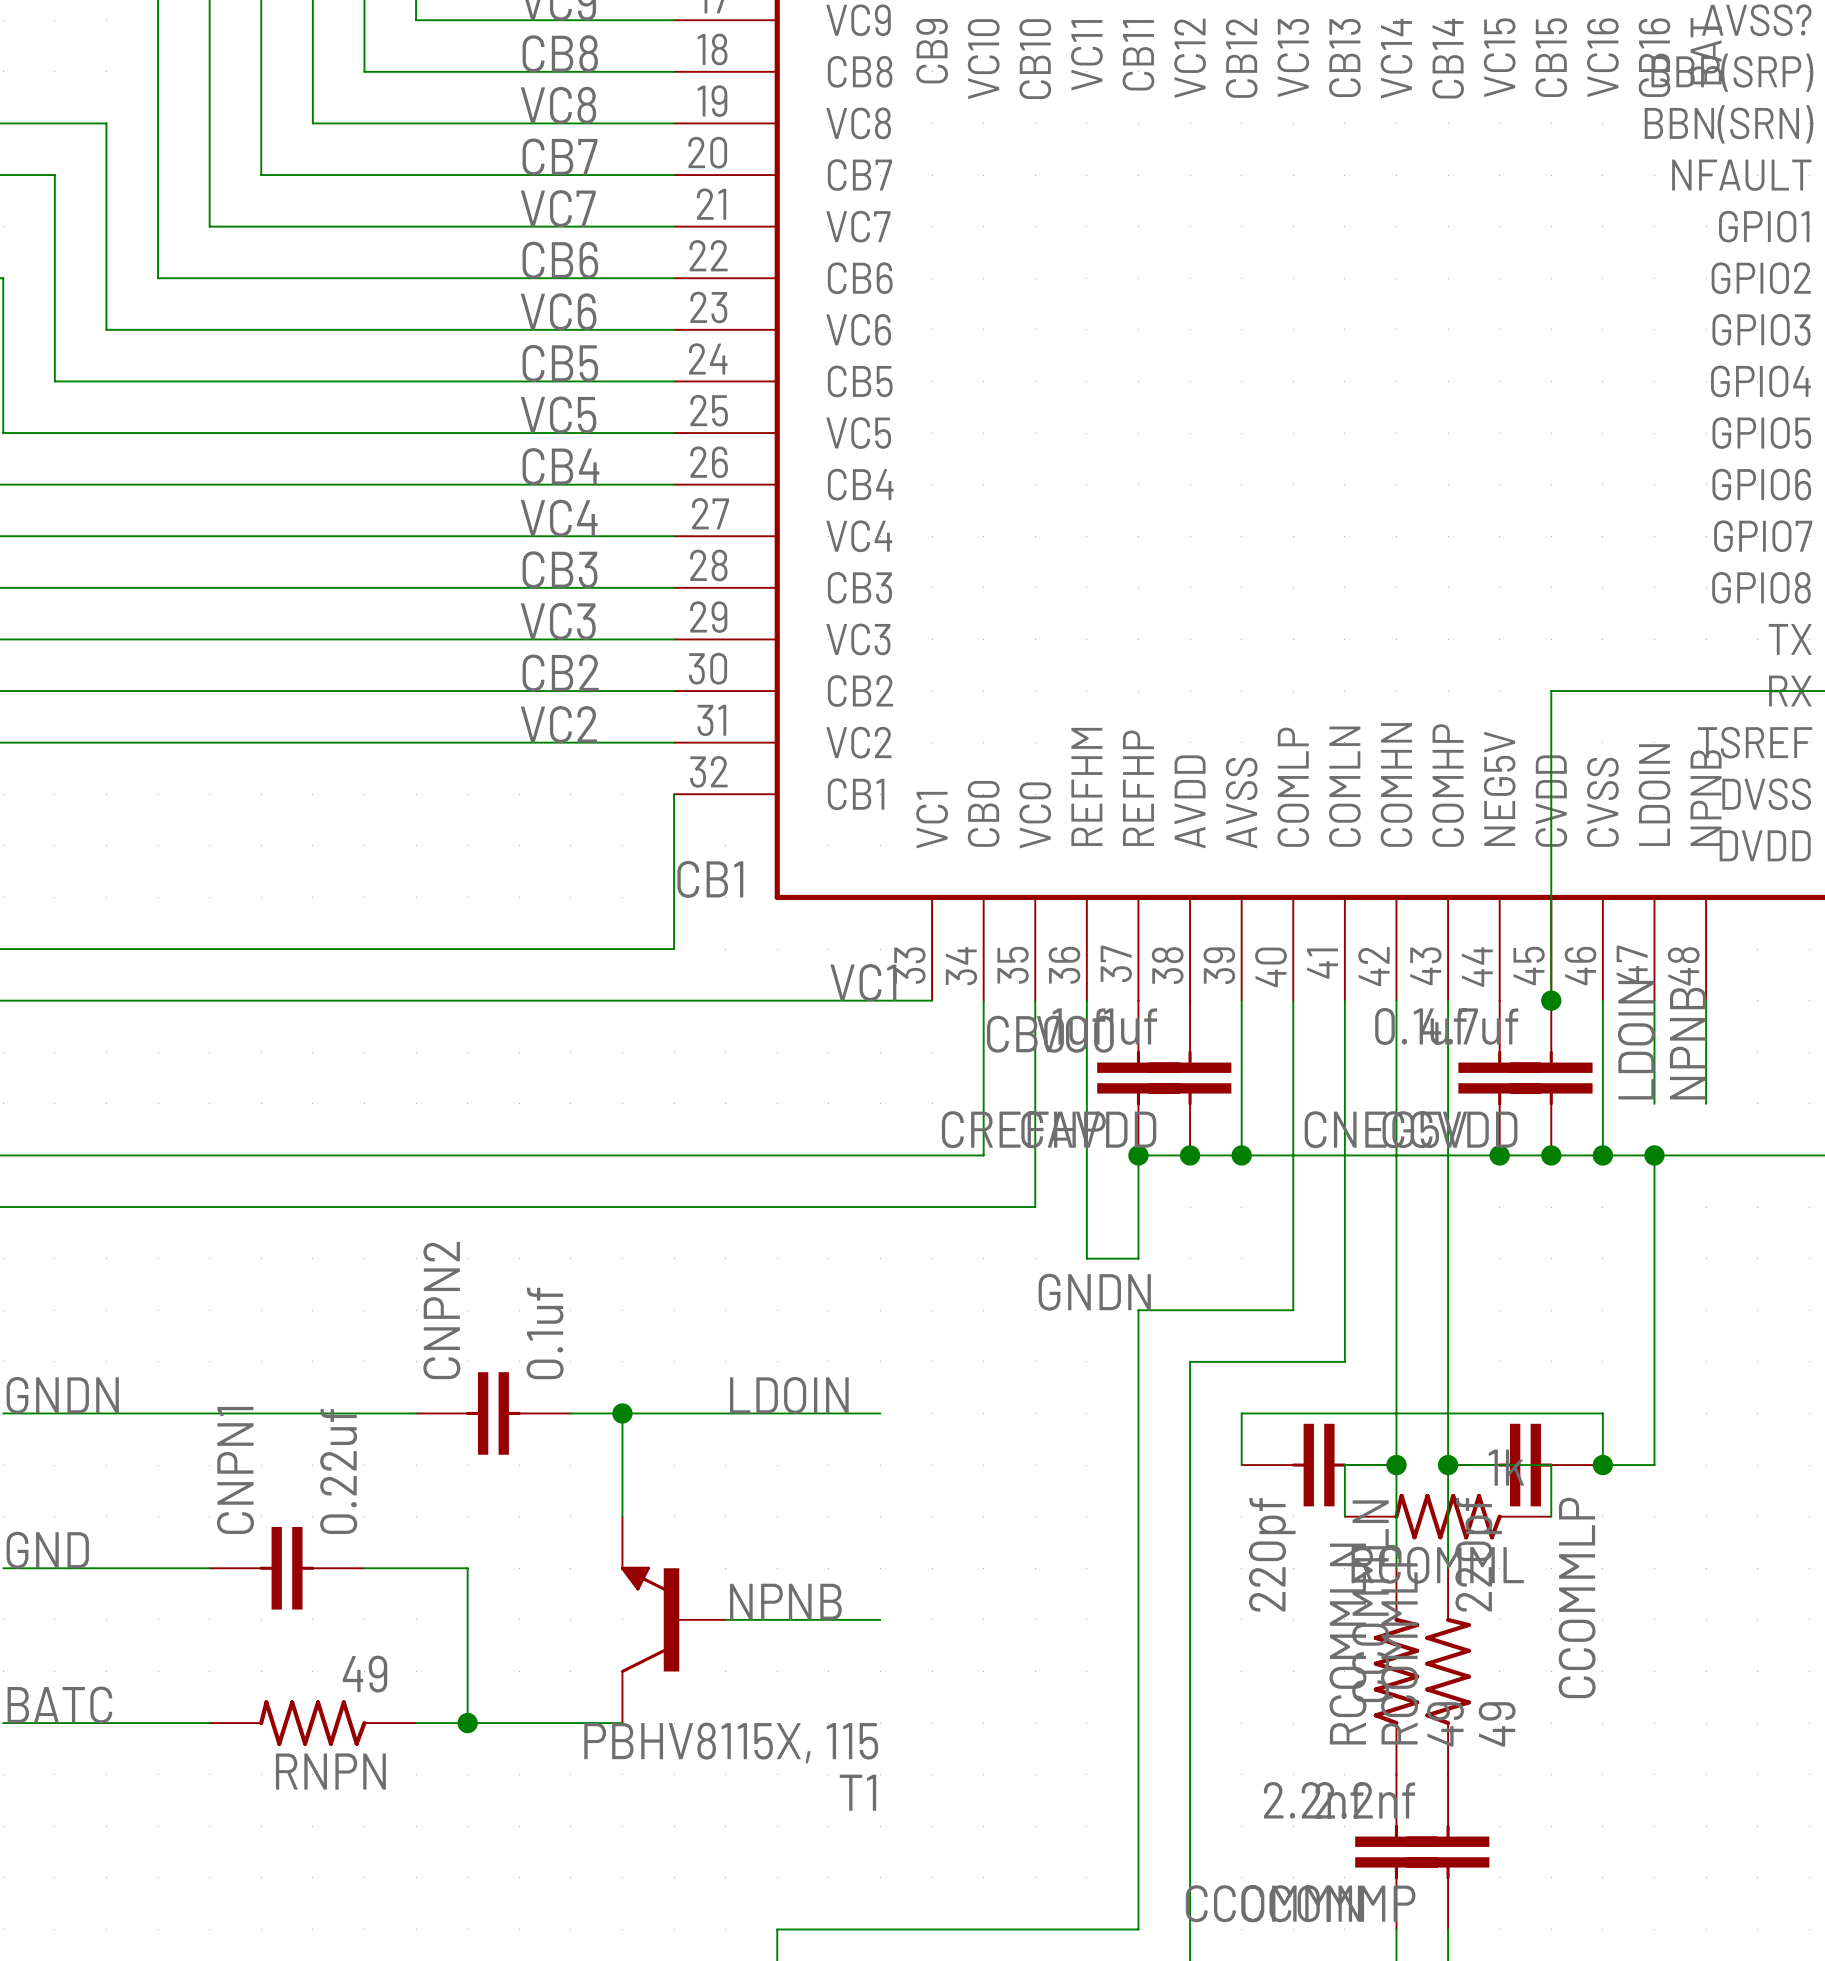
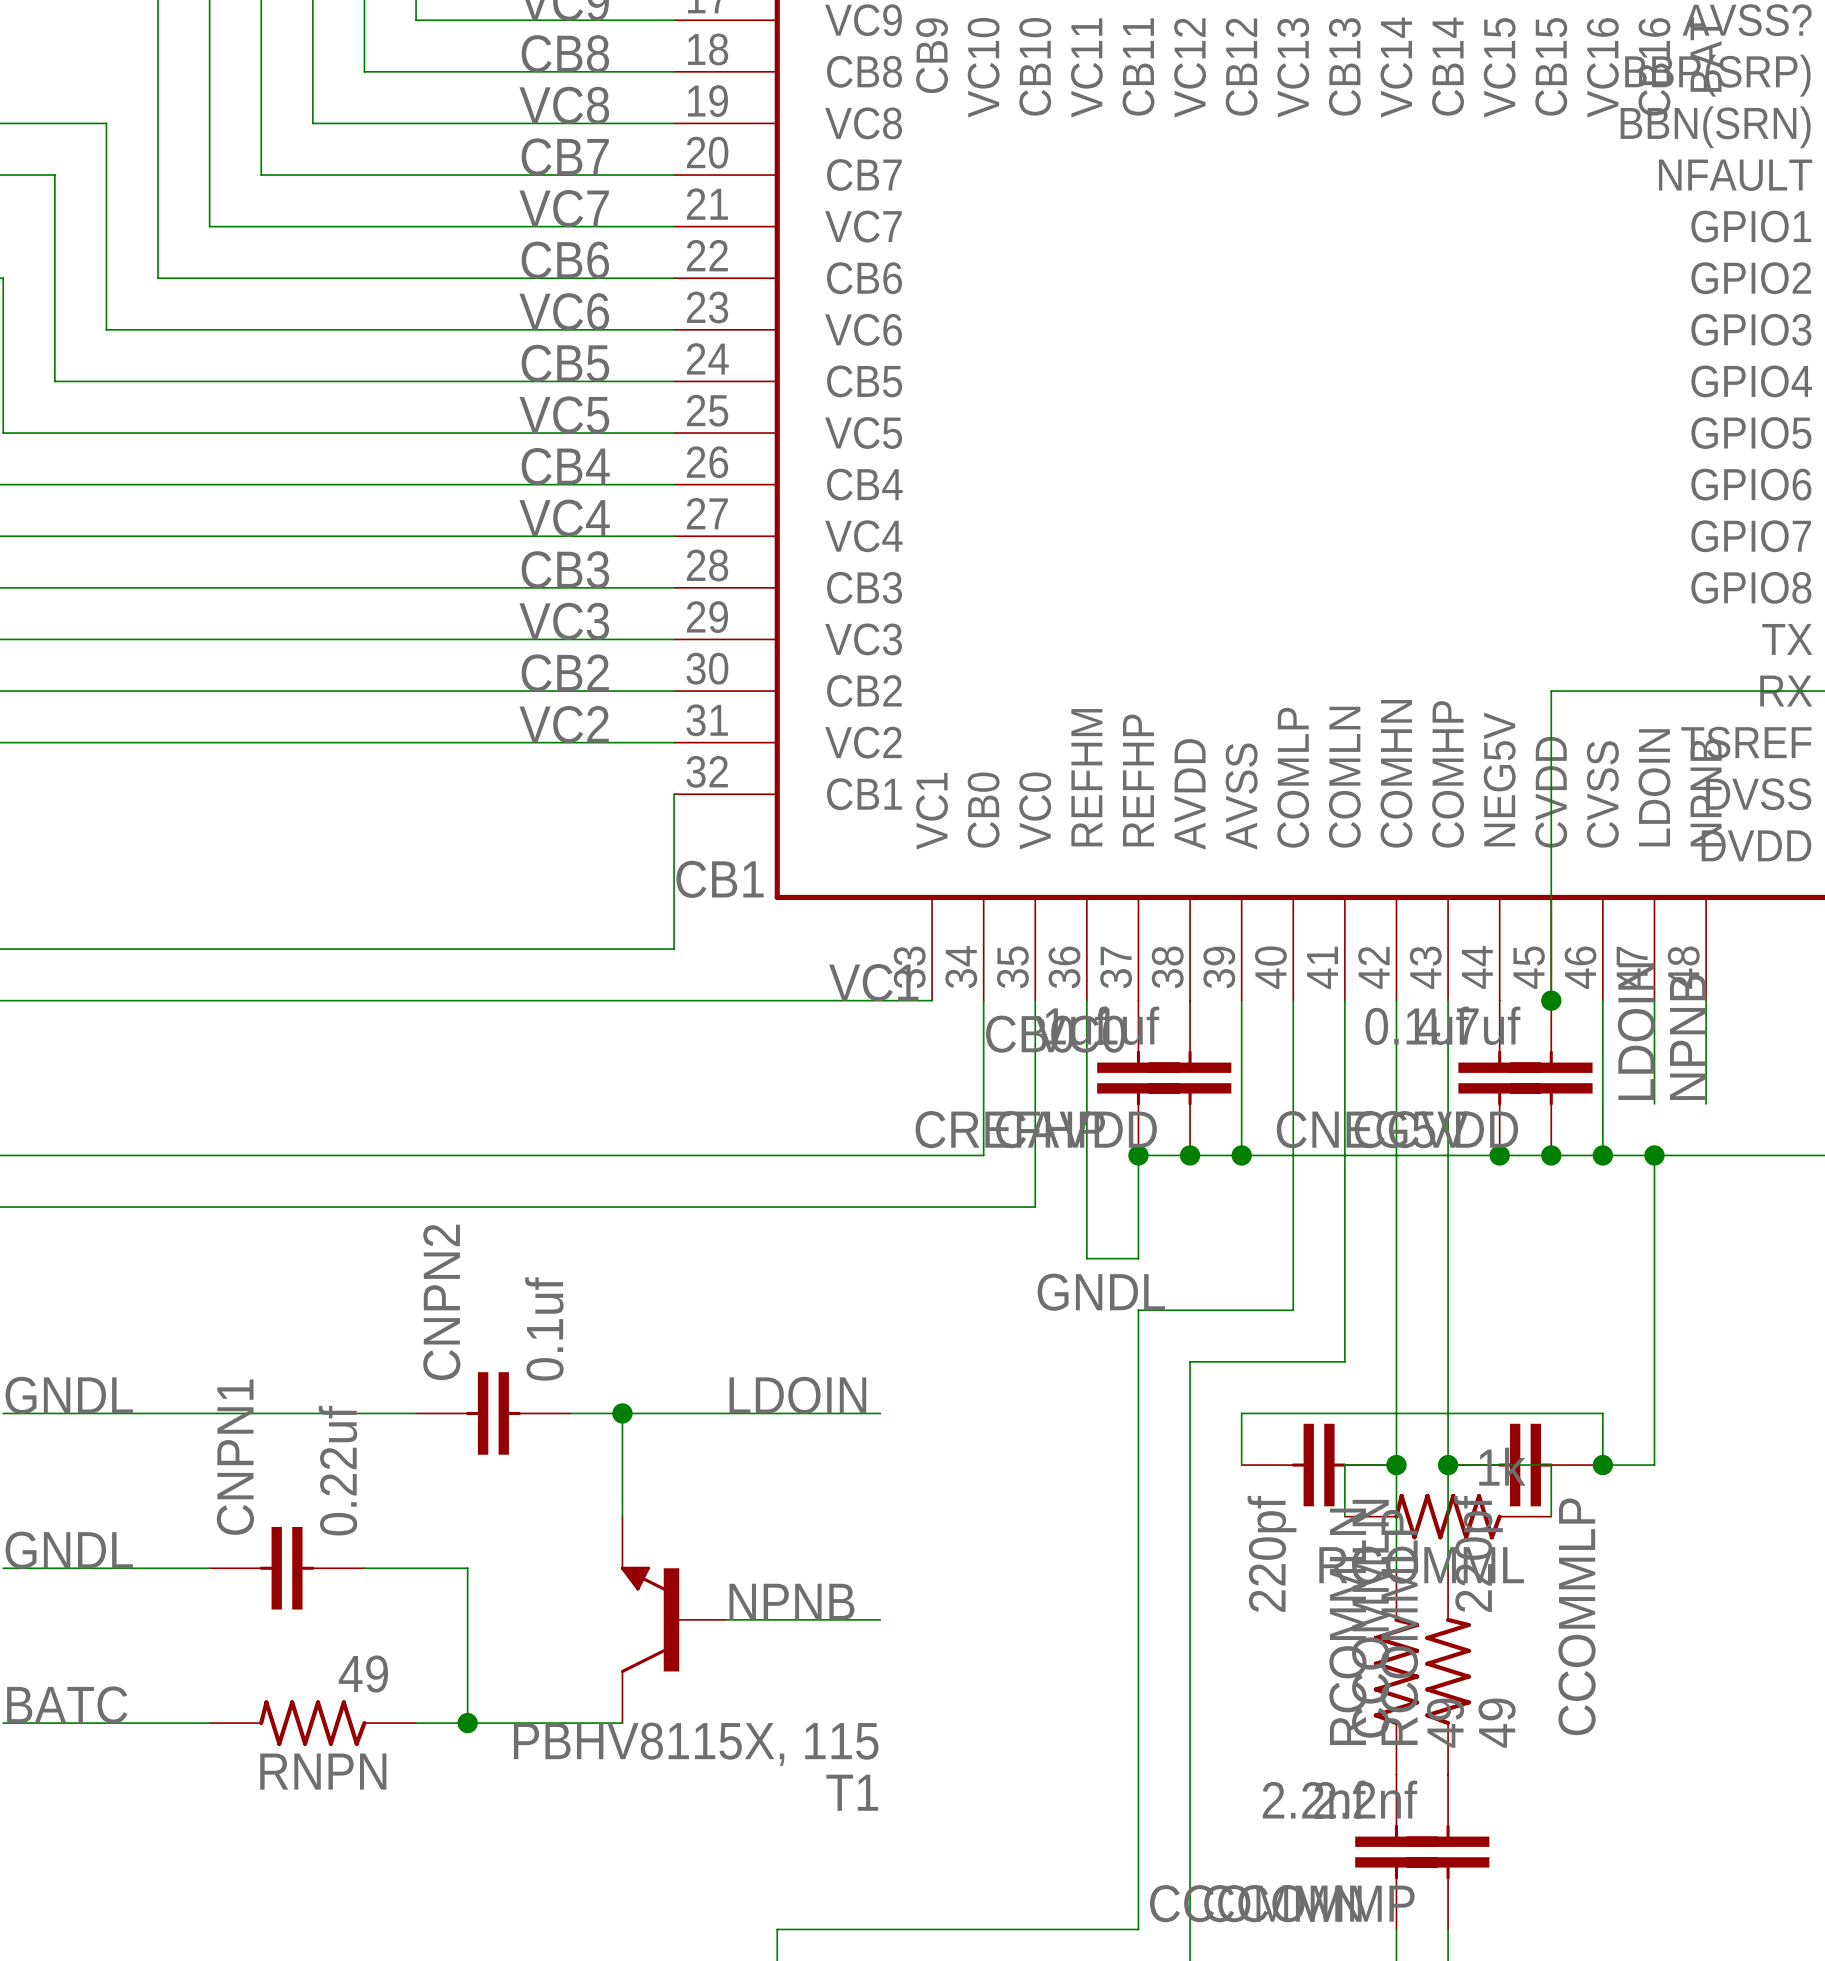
label: GNDN (1094, 1292) -> GNDL (1101, 1292)
label: GNDN (62, 1395) -> GNDL (69, 1395)
label: GND (47, 1550) -> GNDL (69, 1550)

